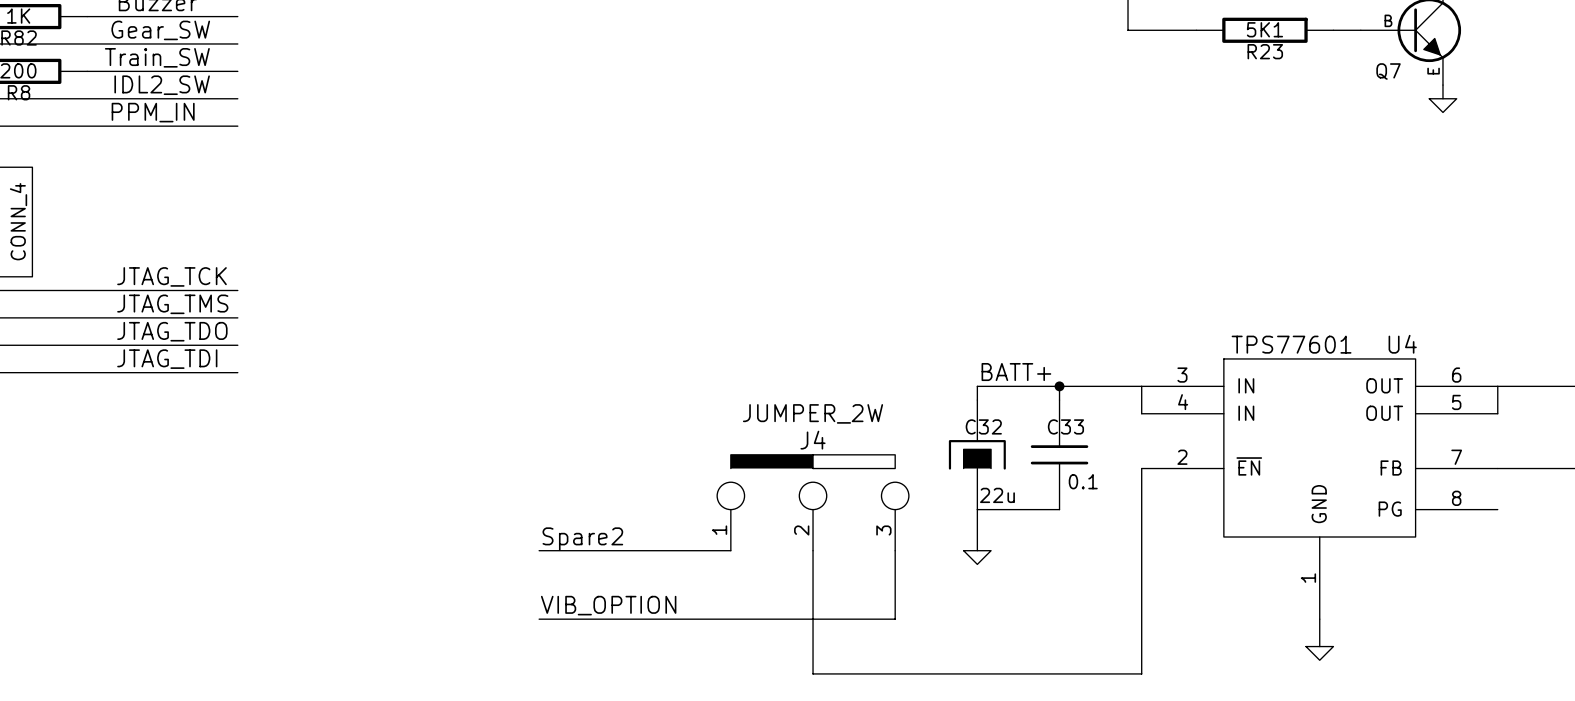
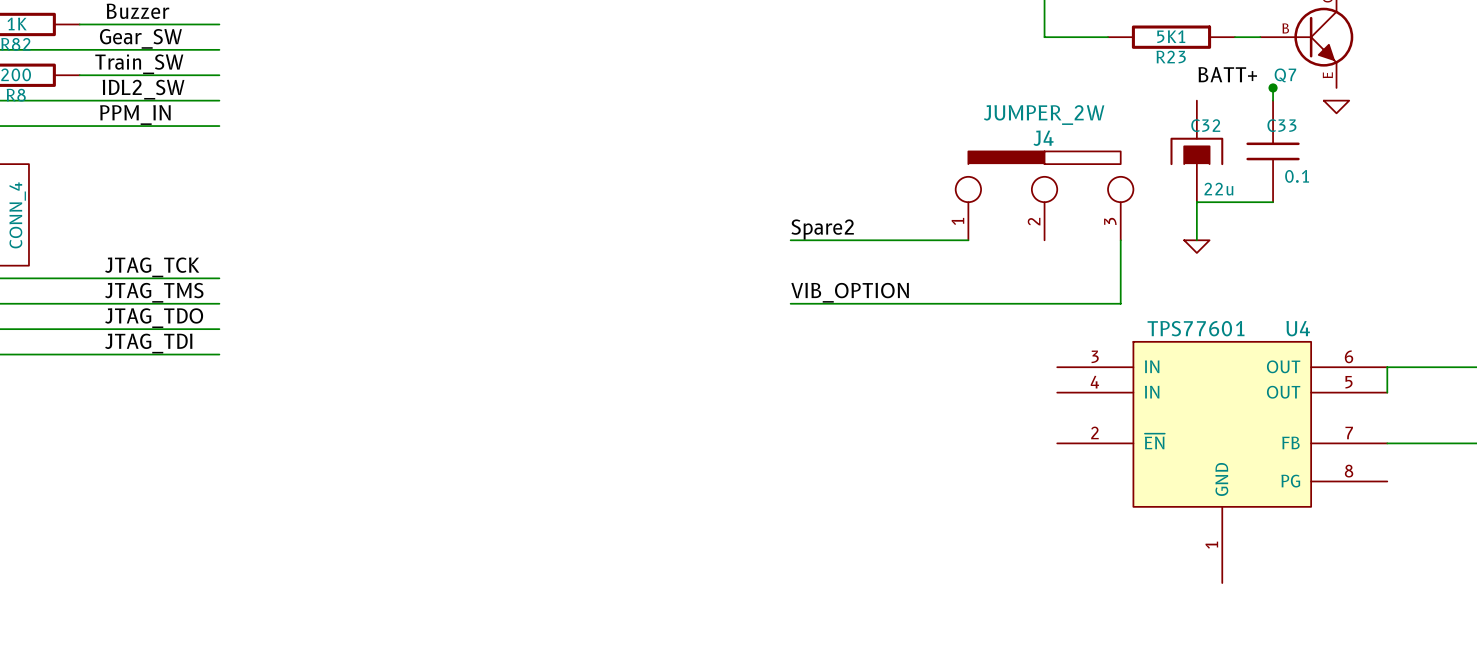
label: none -> BATT+ (1227, 74)
junction: none -> (1273, 87)
wire: (1442, 85) (1442, 98) -> (1273, 87) (1273, 100)
wire: none -> (1273, 202) (1196, 202) (1196, 240)
label: none -> Spare2 (822, 229)
wire: none -> (790, 240) (968, 240)
wire: none -> (1120, 240) (1120, 303) (790, 303)
power symbol: none -> (1196, 246)
label: none -> VIB_OPTION (850, 292)
label: BATT+ (1016, 372) -> none
wire: (1059, 386) (1059, 400) -> none
junction: (1059, 386) -> none
wire: (977, 400) (977, 386) (1141, 386) (1141, 413) -> none
C32 position: (977, 454) -> (1196, 151)
C33 position: (1059, 454) -> (1273, 151)
wire: (1141, 468) (1141, 673) (813, 673) (813, 550) -> none
J4 position: (813, 502) -> (1044, 195)
wire: (1059, 509) (977, 509) (977, 550) -> none
label: Spare2 (582, 539) -> none
wire: (539, 550) (730, 550) -> none
wire: (895, 550) (895, 619) (539, 619) -> none
power symbol: (977, 557) -> none
label: VIB_OPTION (608, 605) -> none
wire: (1319, 619) (1319, 646) -> none
power symbol: (1319, 653) -> none

